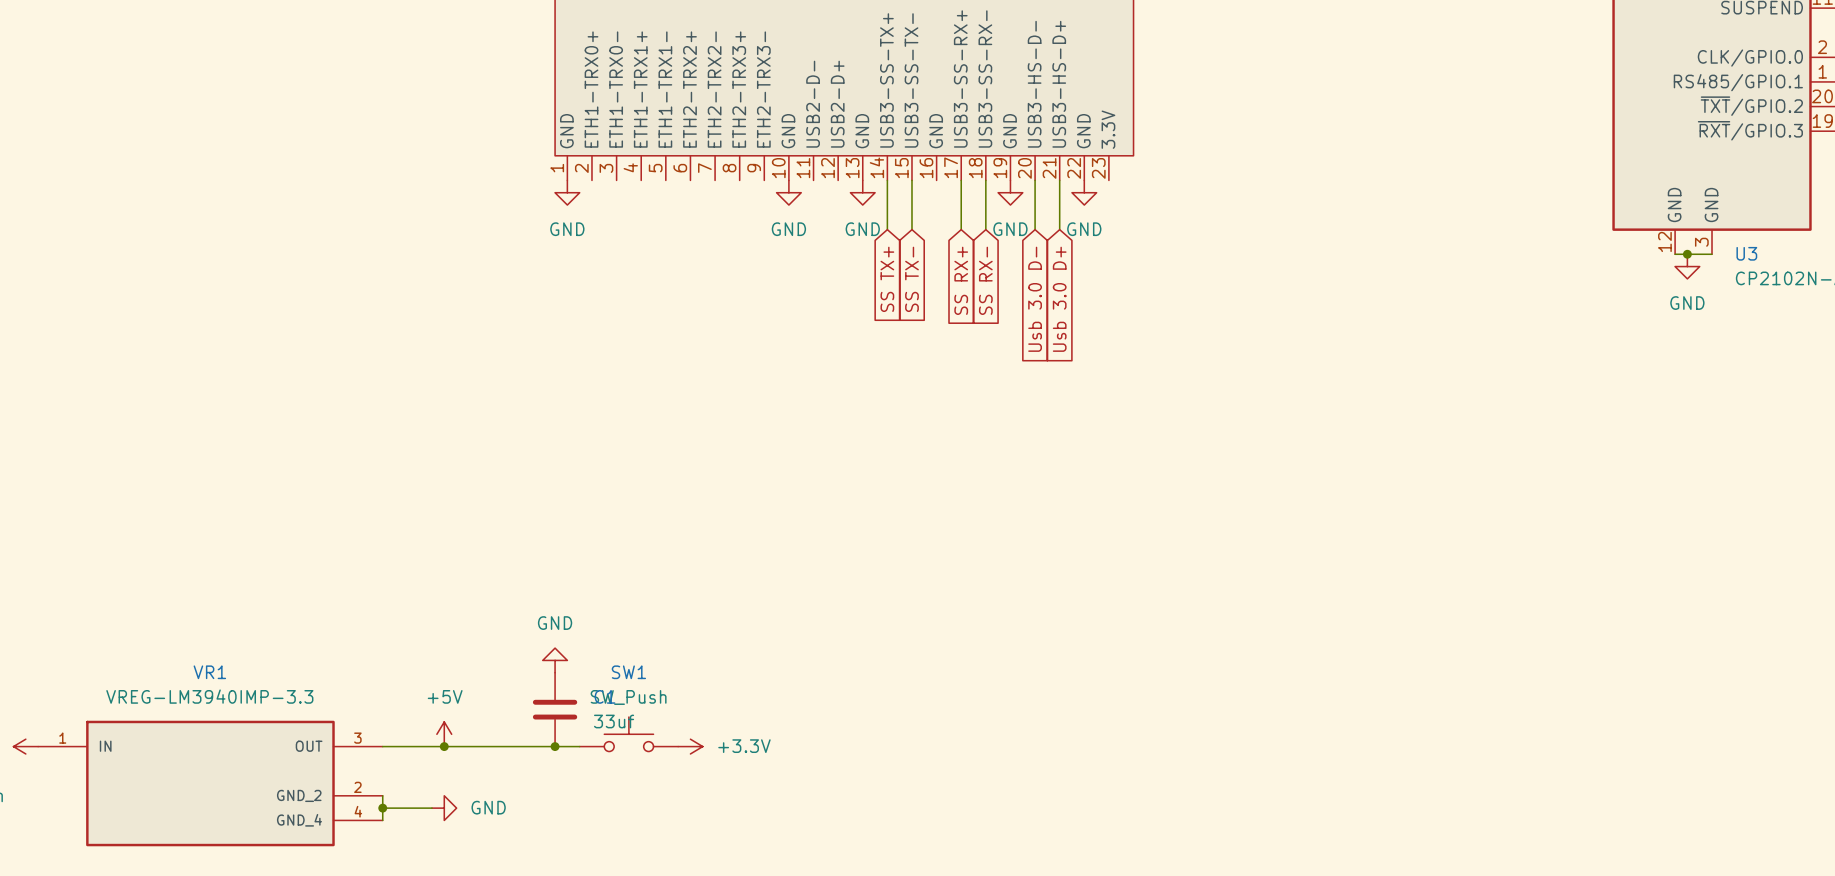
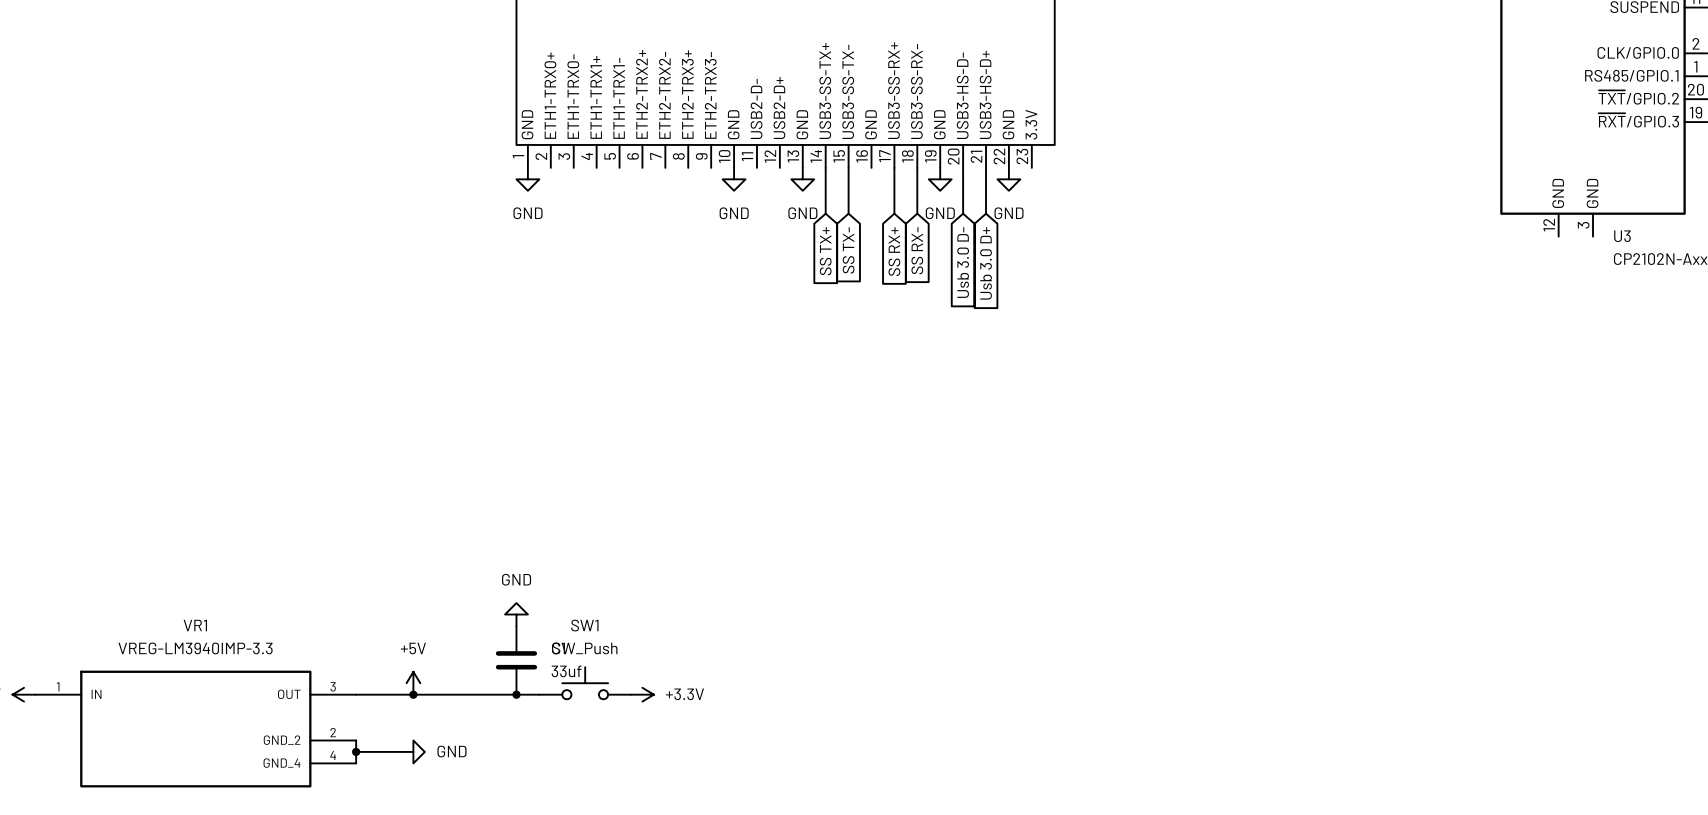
wire: (1675, 254) (1712, 254) -> none
junction: (1687, 254) -> none
power symbol: GND (1687, 266) -> none

